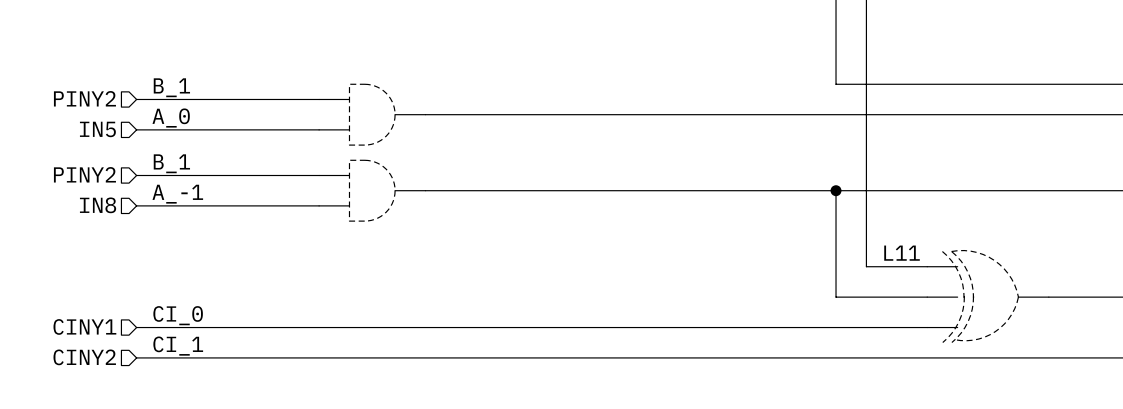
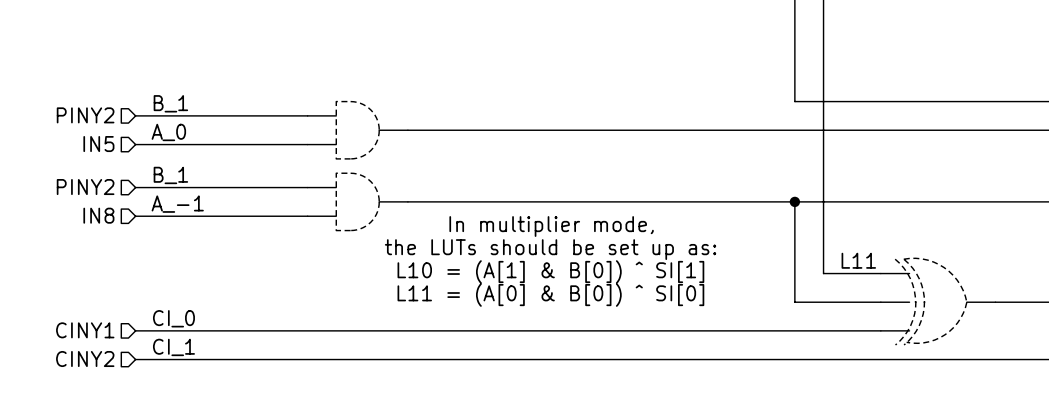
text: none -> In multiplier mode, (551, 226)
text: none -> the LUTs should be set up as: (550, 249)
text: none -> L10 = (A[1] & B[0]) ^ SI[1] (550, 271)
text: none -> L11 = (A[0] & B[0]) ^ SI[0] (550, 295)

